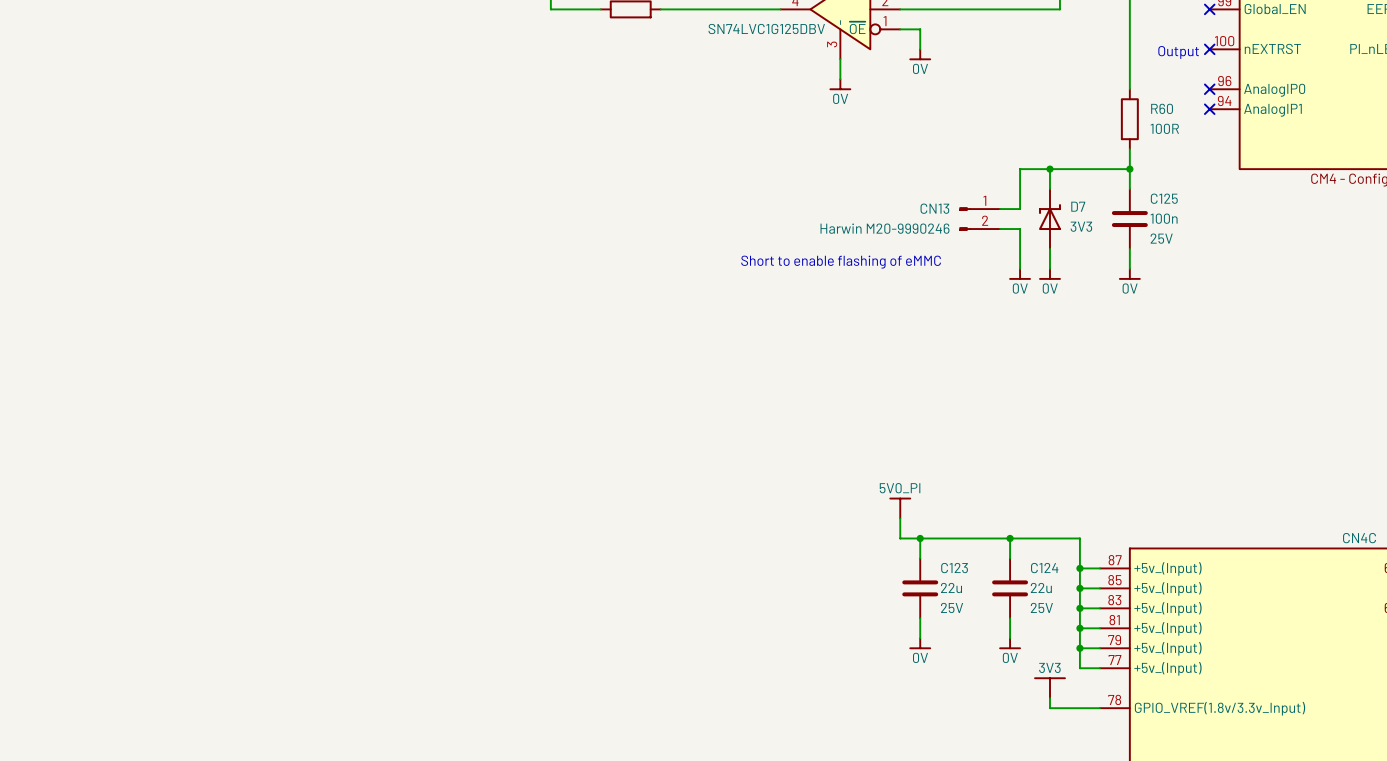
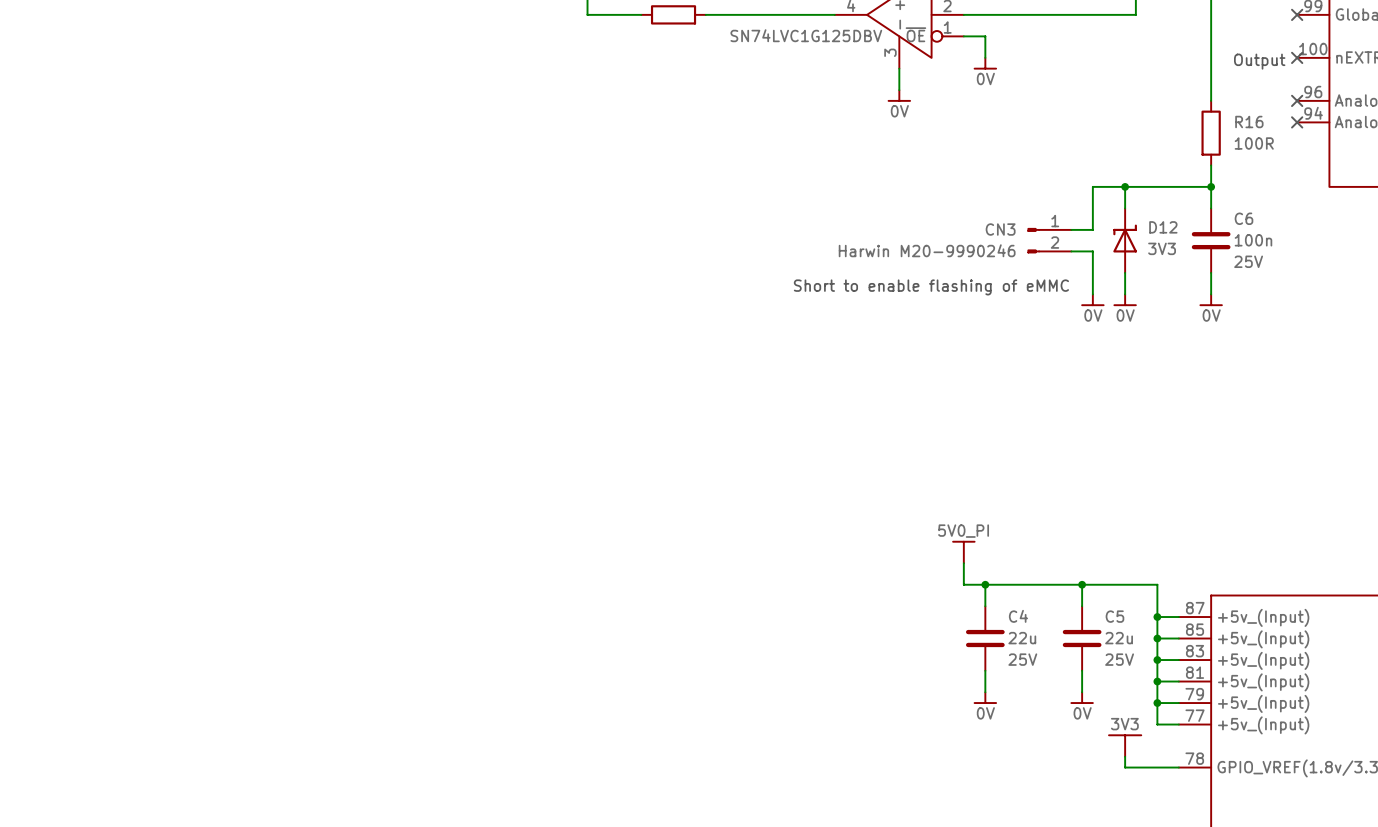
R60 name: R60 (1162, 108) -> R16 (1249, 122)
C125 name: C125 (1164, 198) -> C6 (1244, 218)
D7 name: D7 (1078, 206) -> D12 (1163, 227)
CN13 name: CN13 (934, 208) -> CN3 (1000, 229)
C123 name: C123 (954, 568) -> C4 (1018, 616)
C124 name: C124 (1044, 568) -> C5 (1114, 616)

